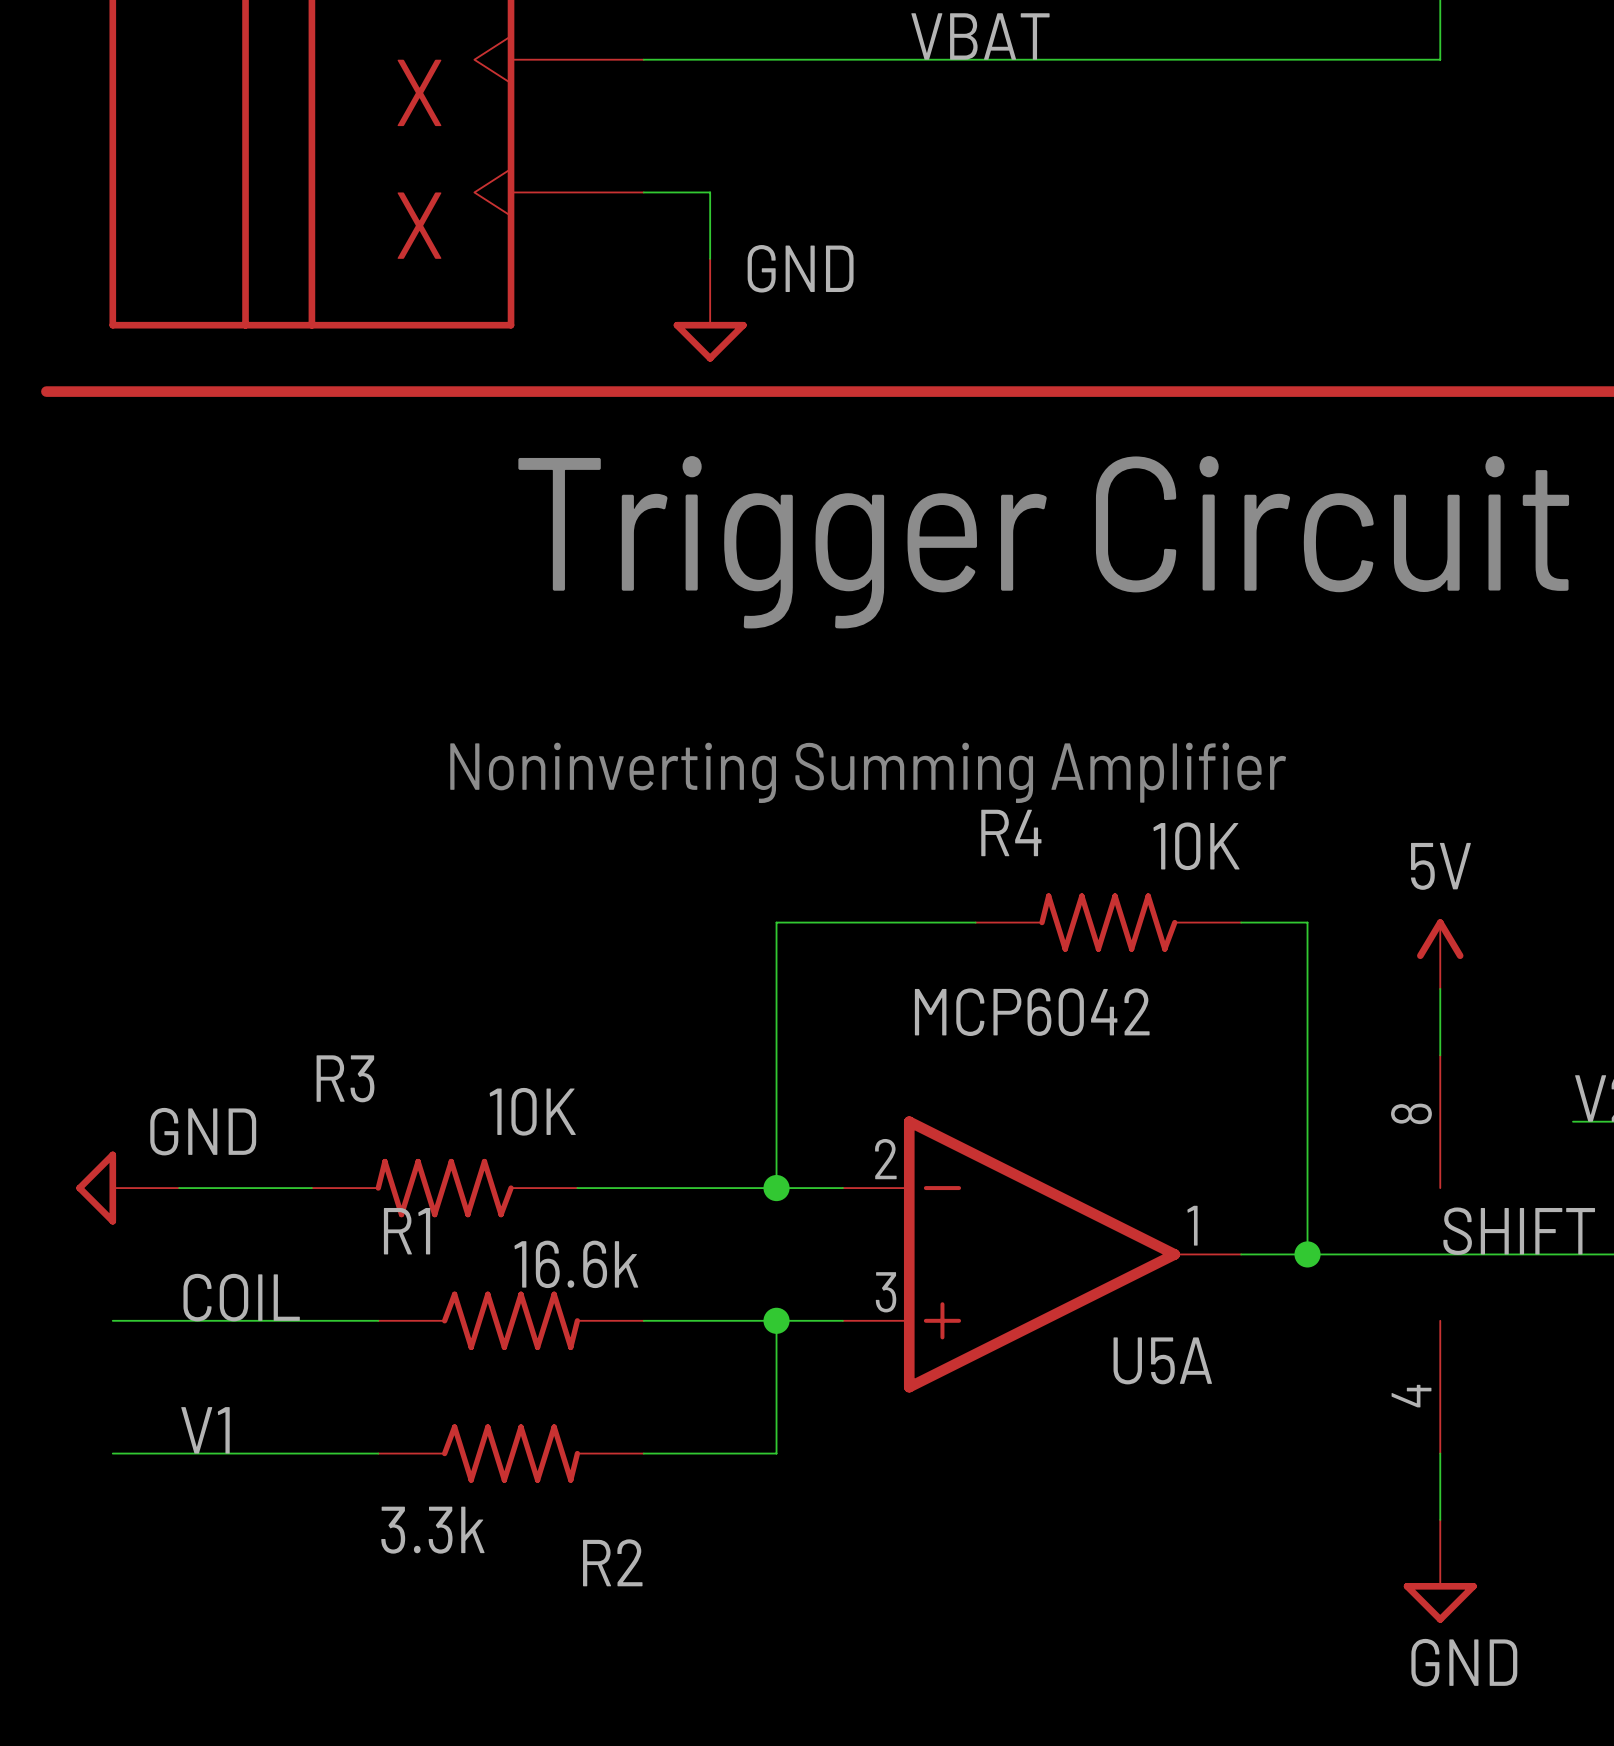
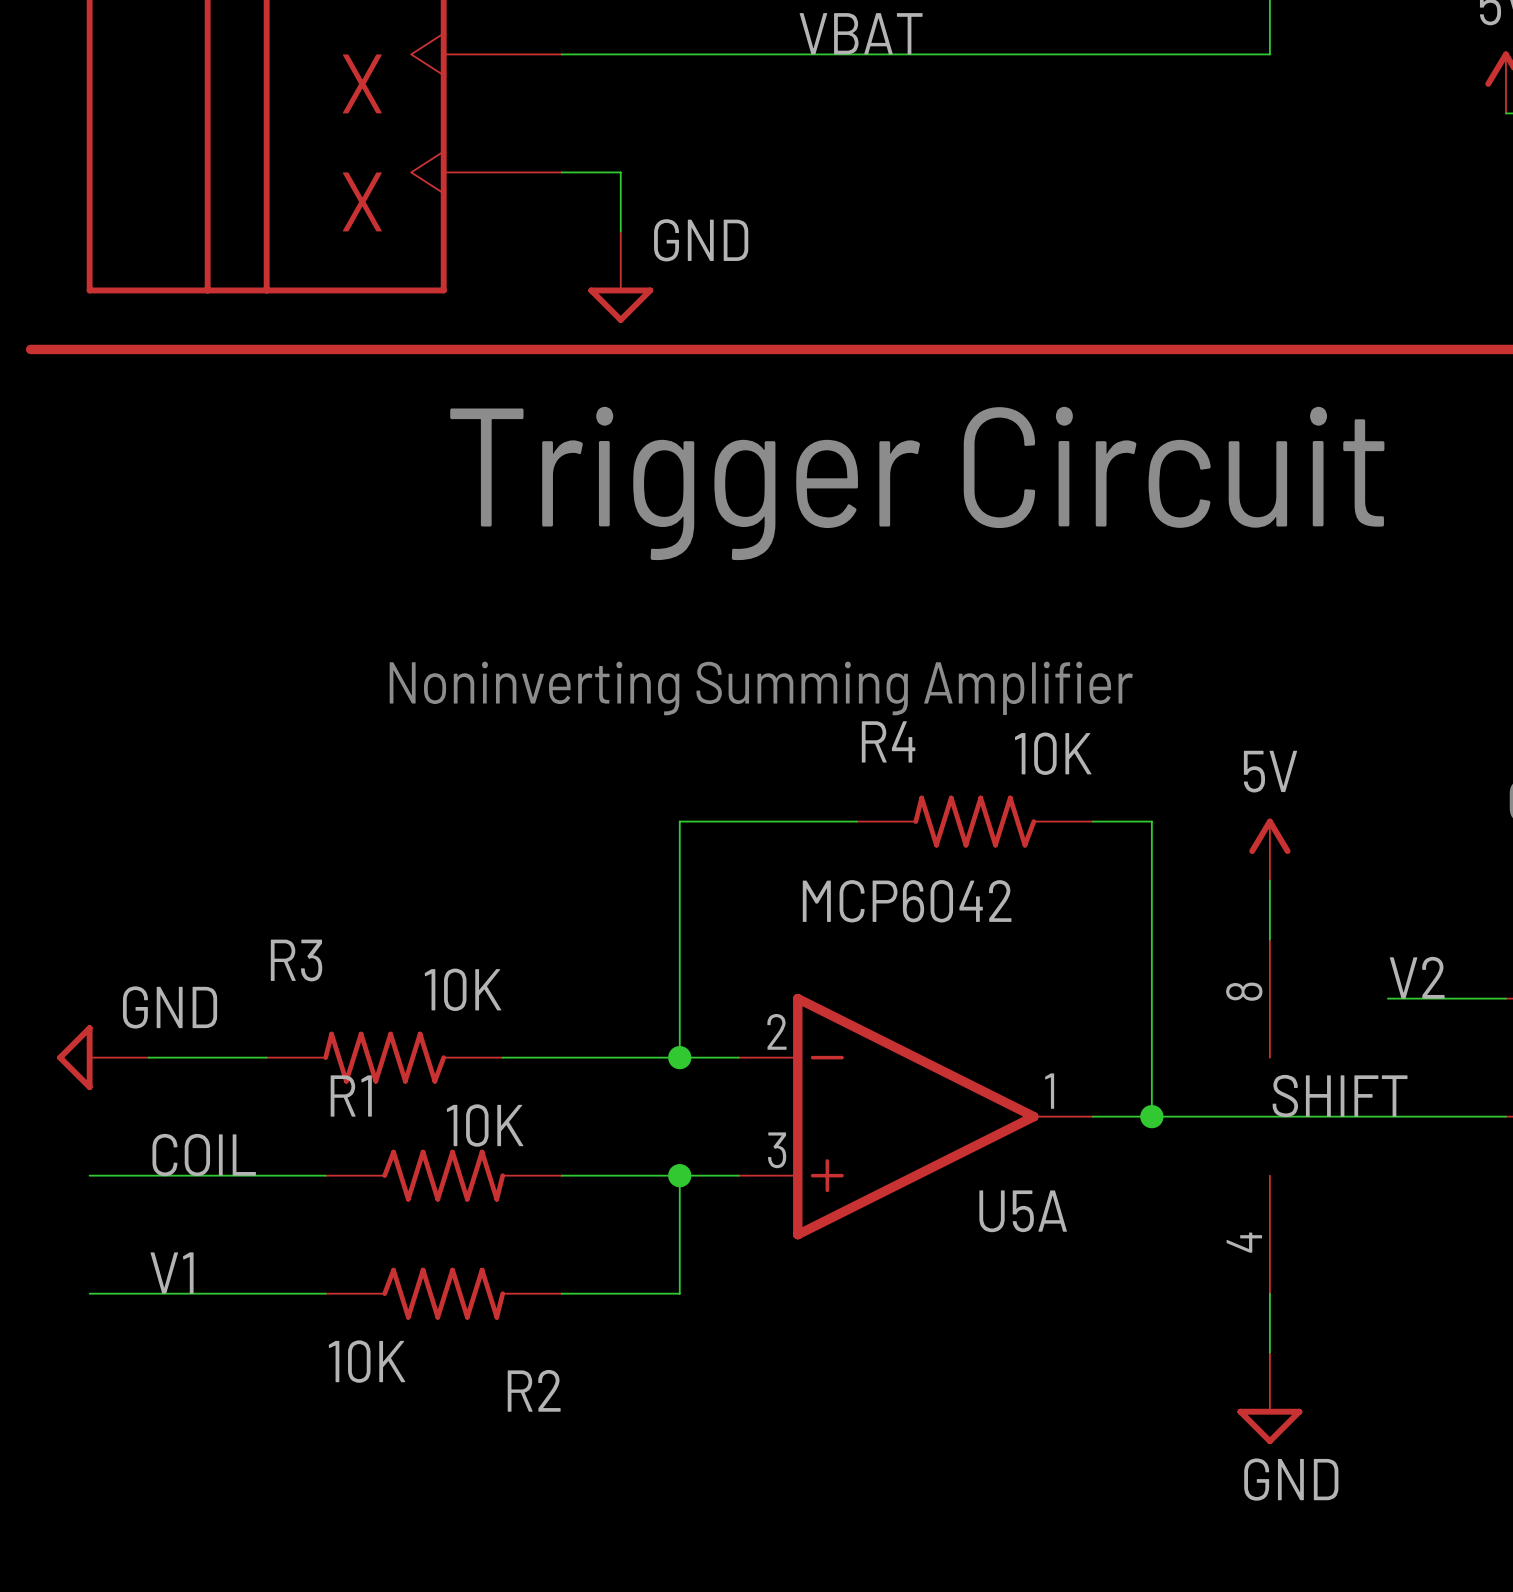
R1 value: 16.6k (576, 1264) -> 10K (485, 1125)
R2 value: 3.3k (432, 1530) -> 10K (367, 1361)

